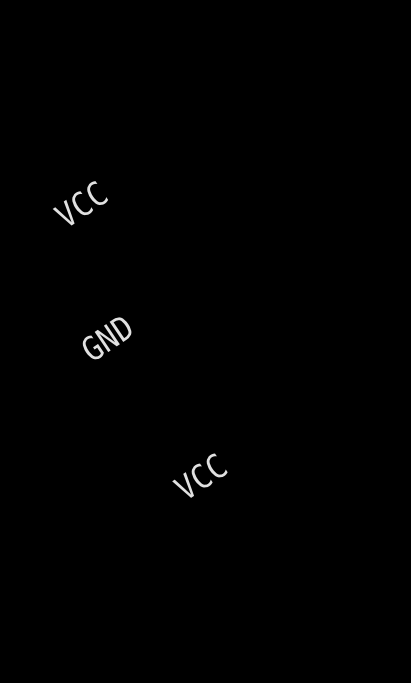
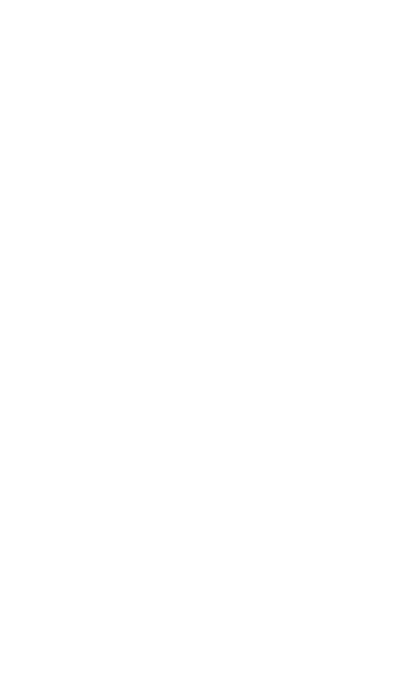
text: VCC (80, 203) -> none
text: GND (107, 338) -> none
text: VCC (199, 475) -> none

